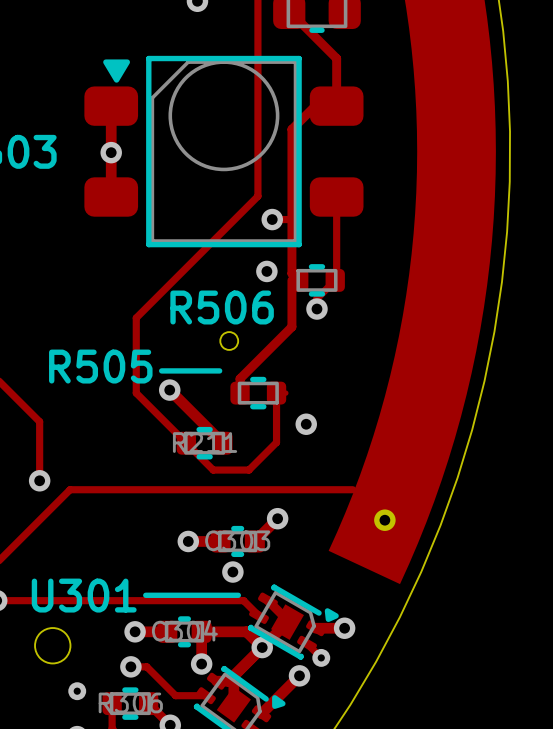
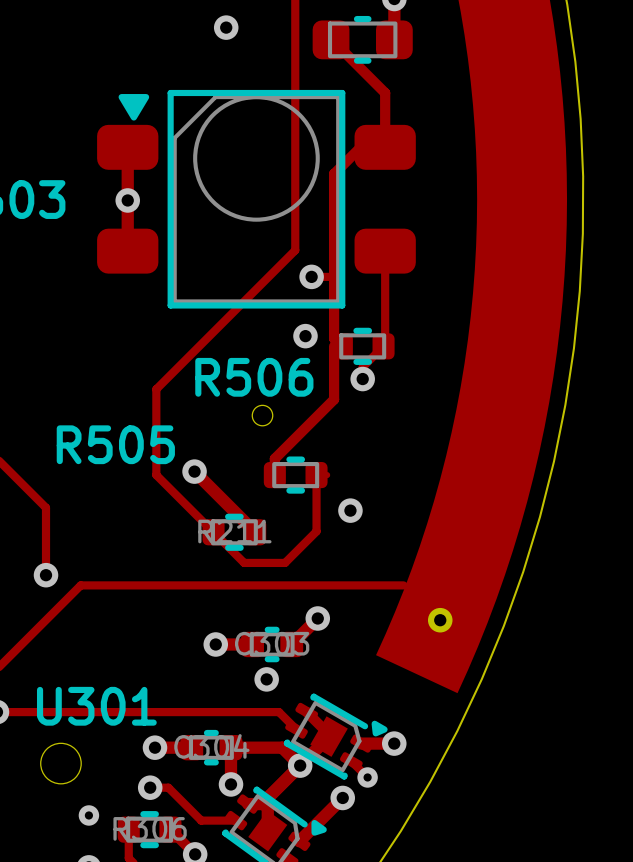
line: (161, 370) (219, 370) -> none
line: (145, 595) (238, 595) -> none

